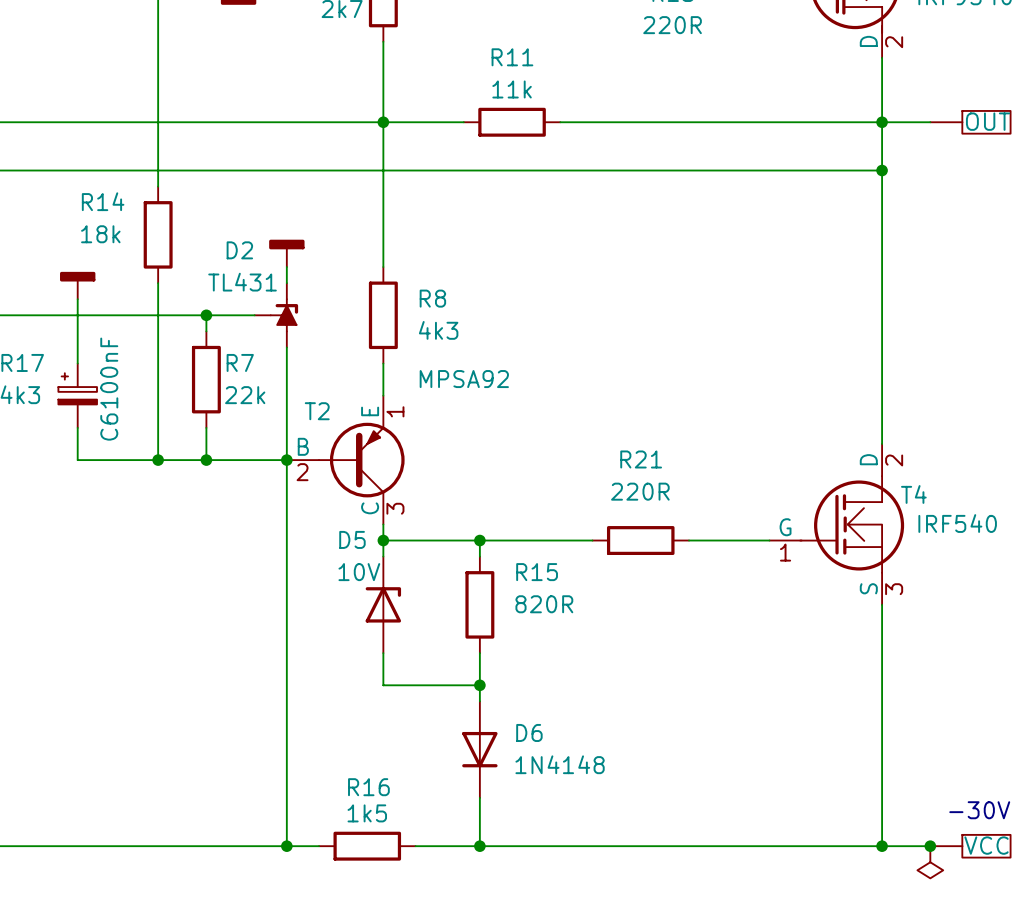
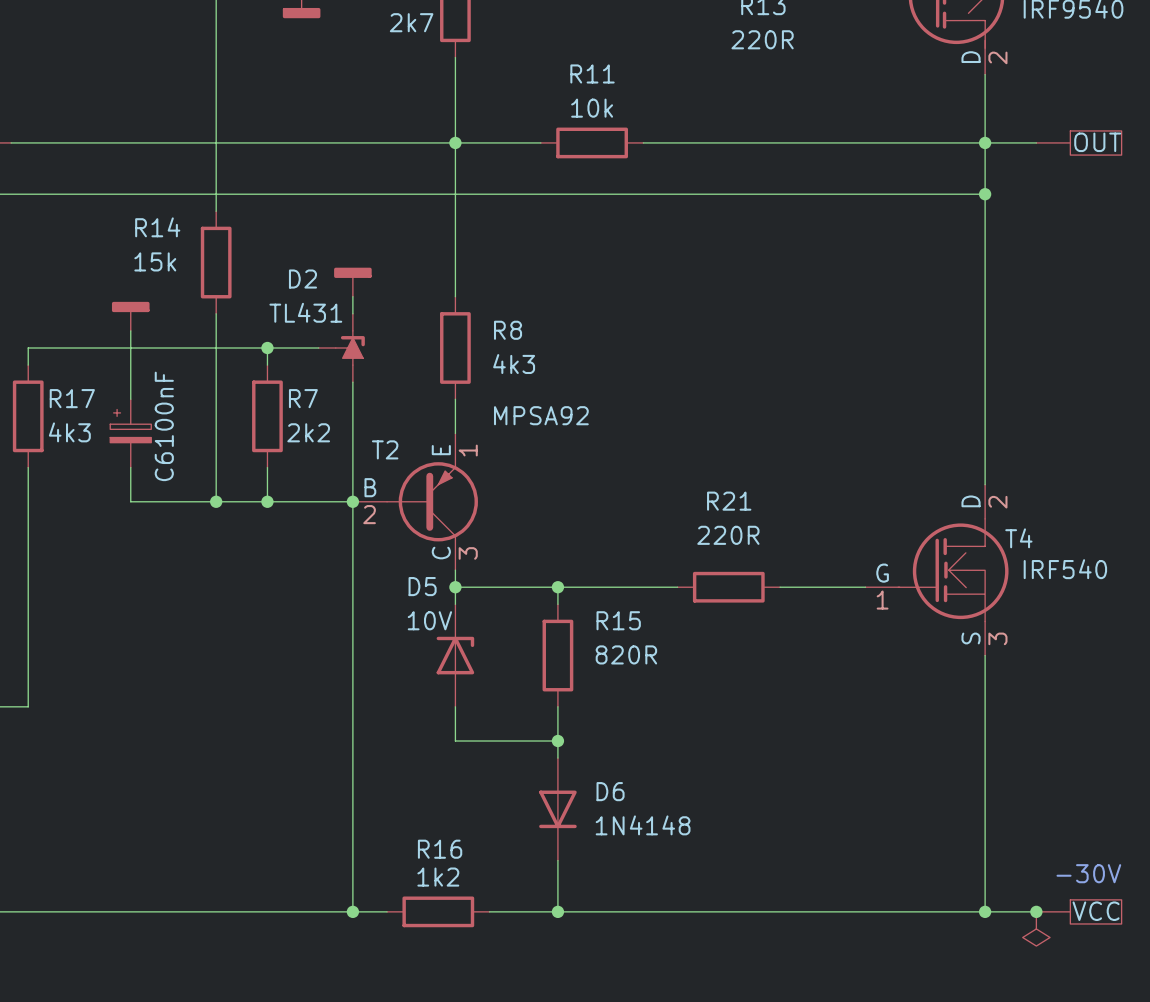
R11 value: 11k (512, 89) -> 10k (592, 108)
R14 value: 18k (100, 234) -> 15k (155, 261)
R7 value: 22k (245, 395) -> 2k2 (308, 432)
R16 value: 1k5 (367, 813) -> 1k2 (438, 877)

